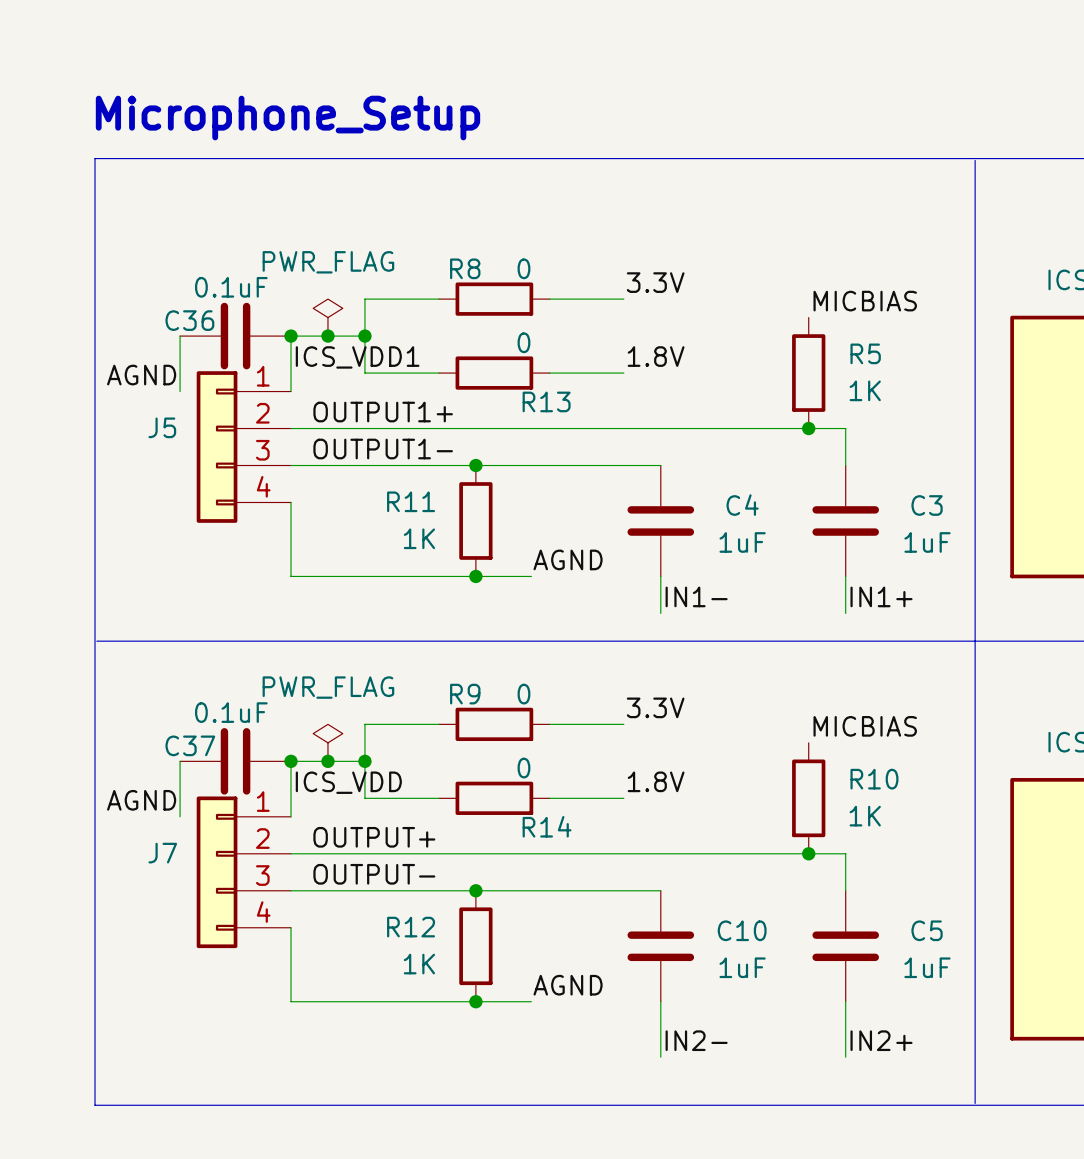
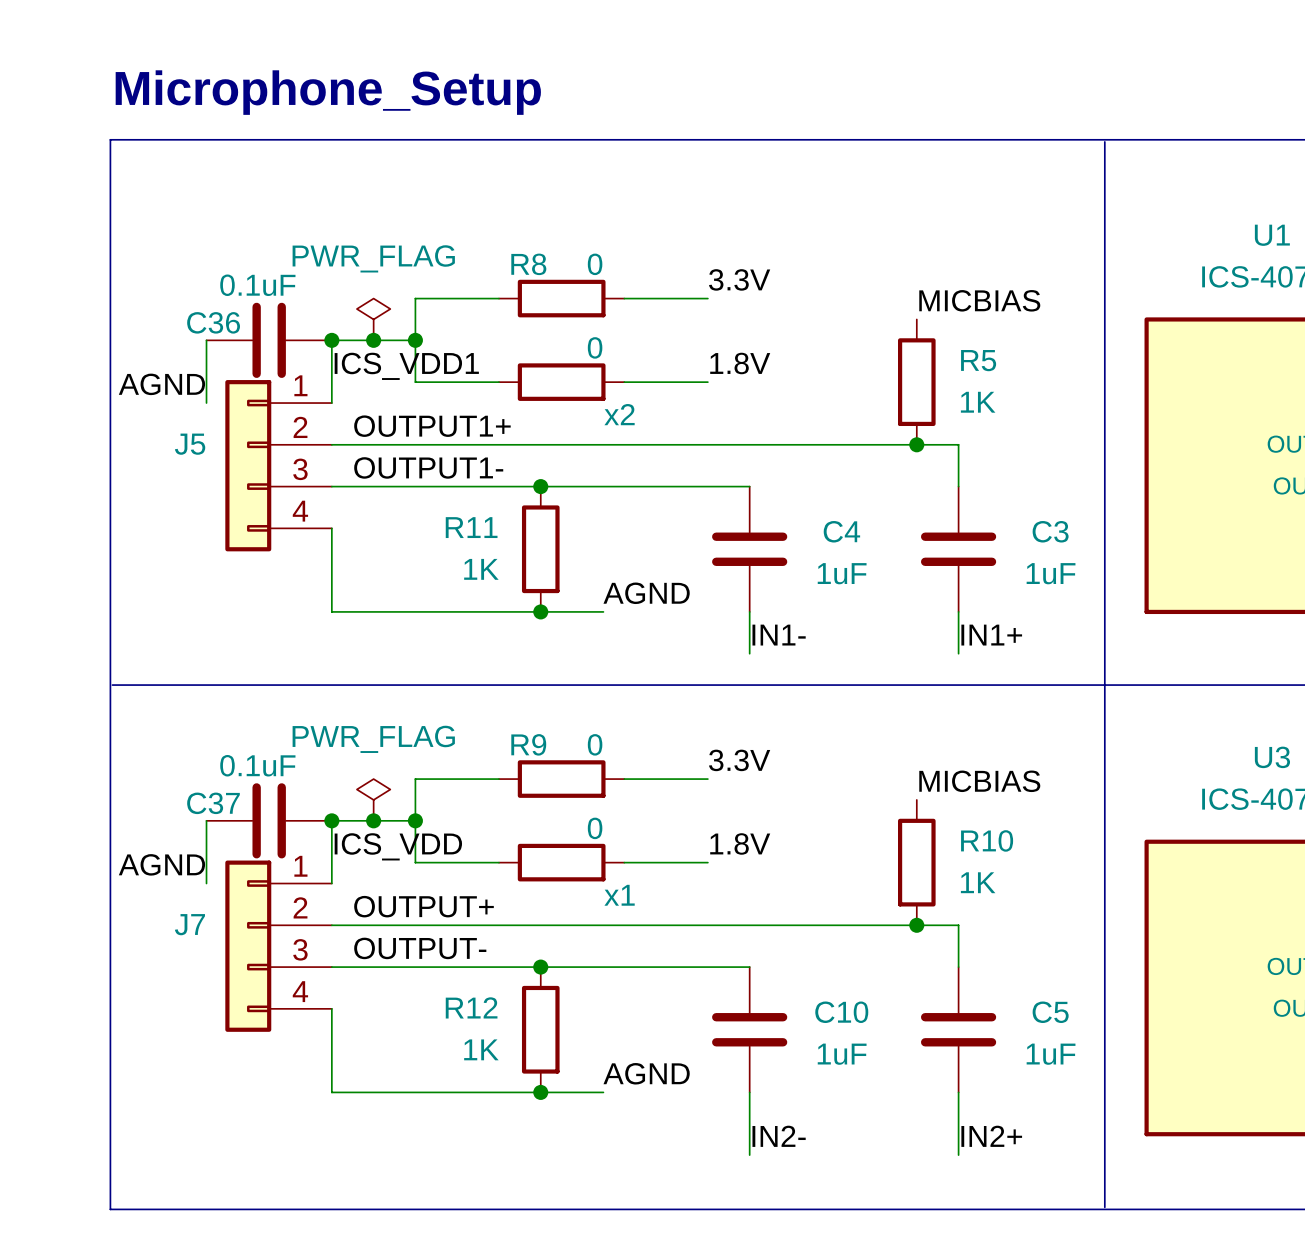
R13 name: R13 (546, 401) -> x2 (619, 414)
R14 name: R14 (547, 826) -> x1 (619, 895)

